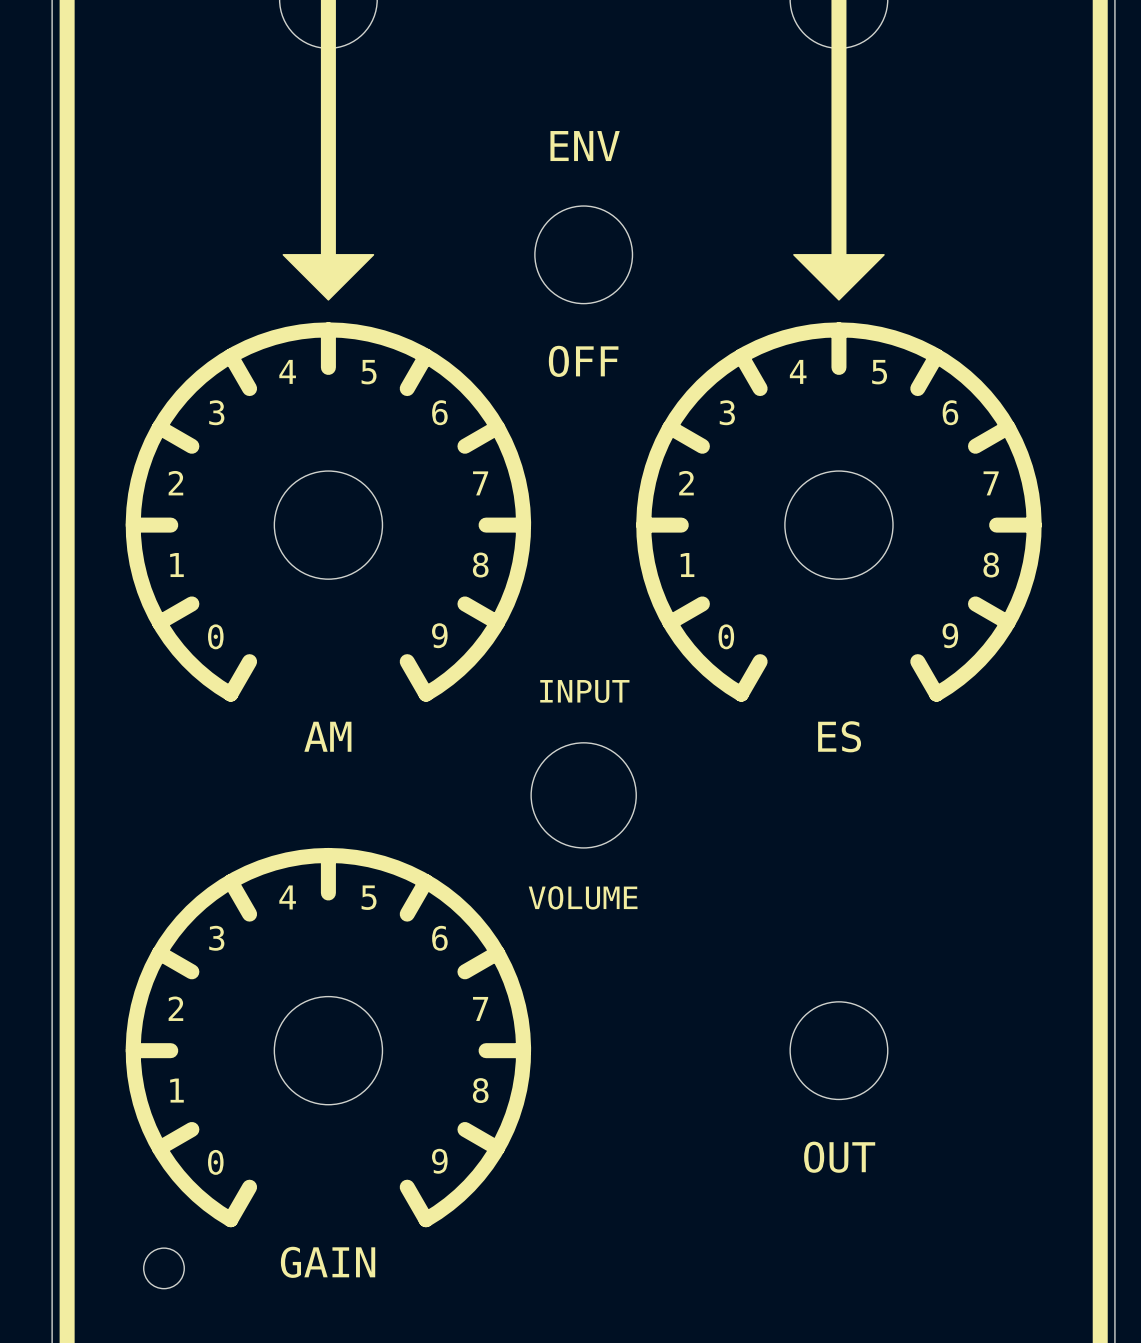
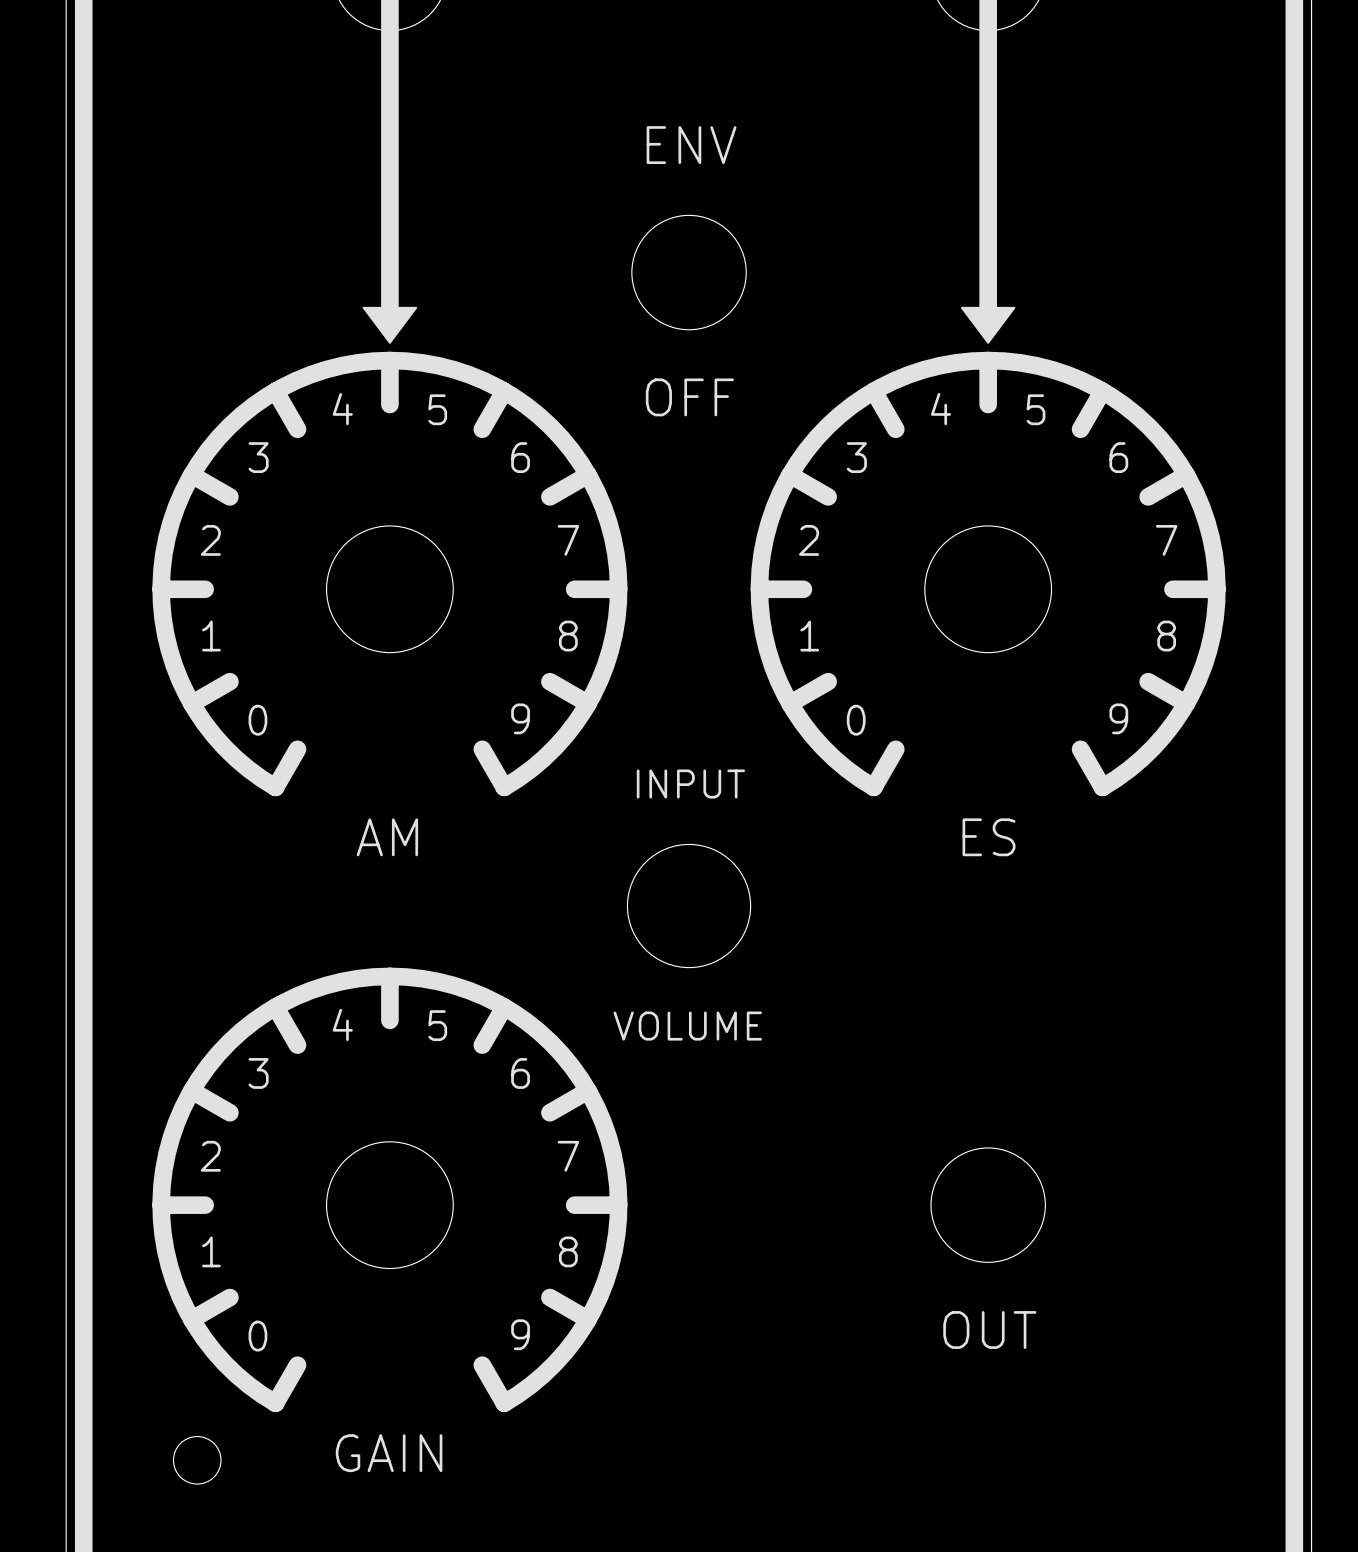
drawing: [282, 254, 375, 301] -> none
drawing: [793, 254, 885, 301] -> none
drawing: none -> [362, 306, 418, 344]
drawing: none -> [960, 306, 1016, 344]

